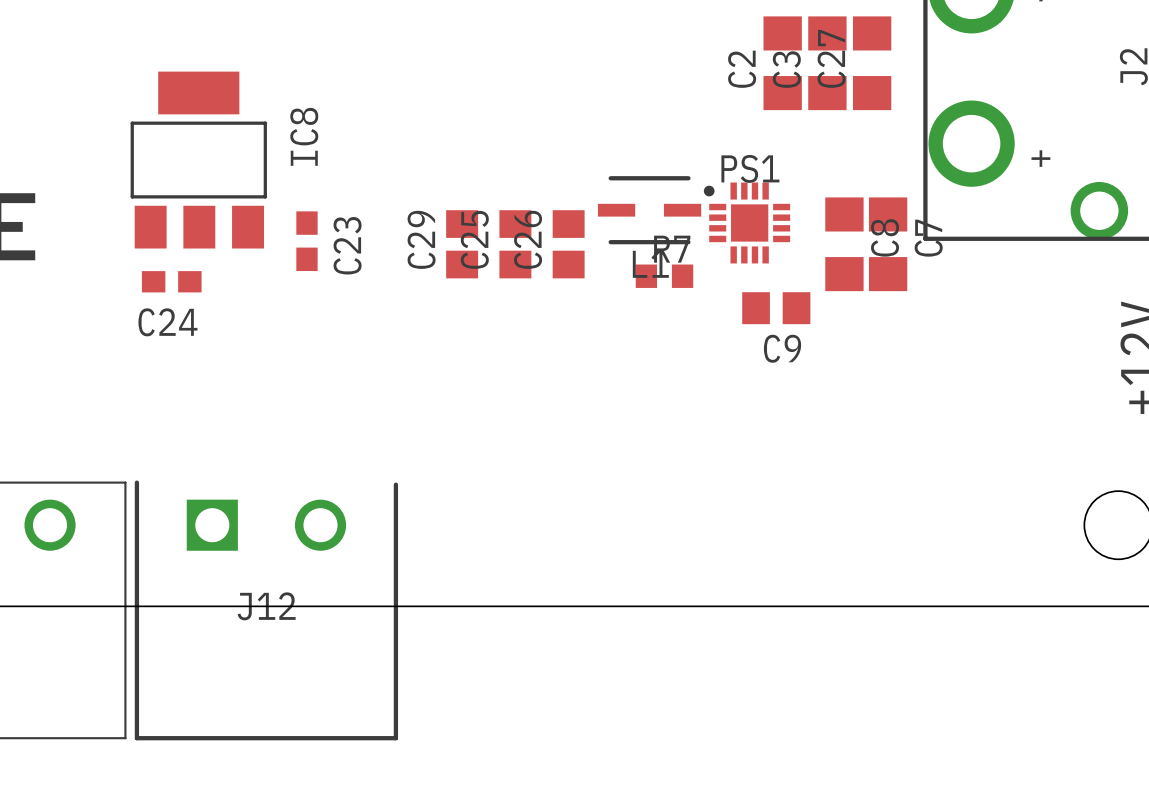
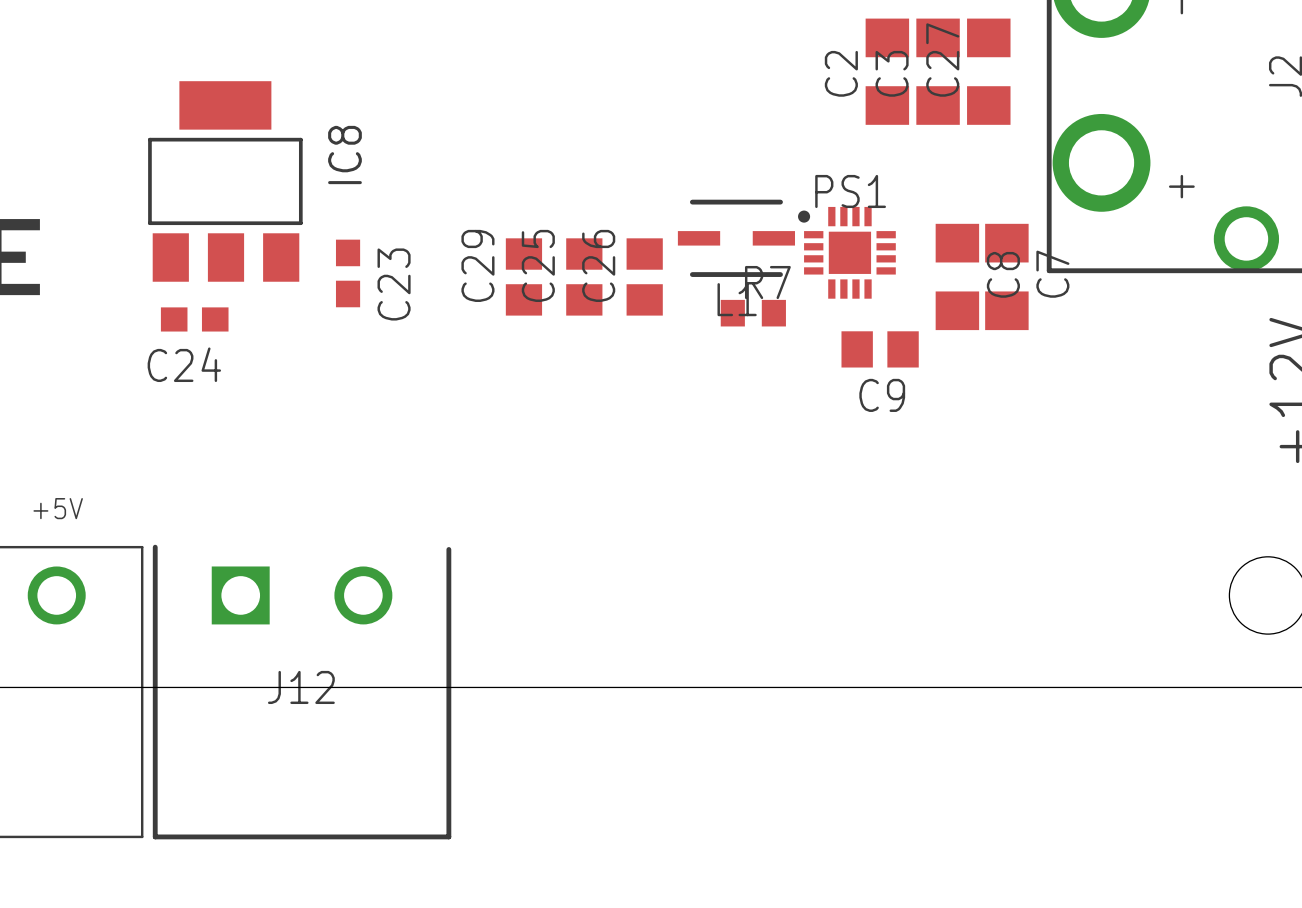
text: none -> +5V (58, 508)

